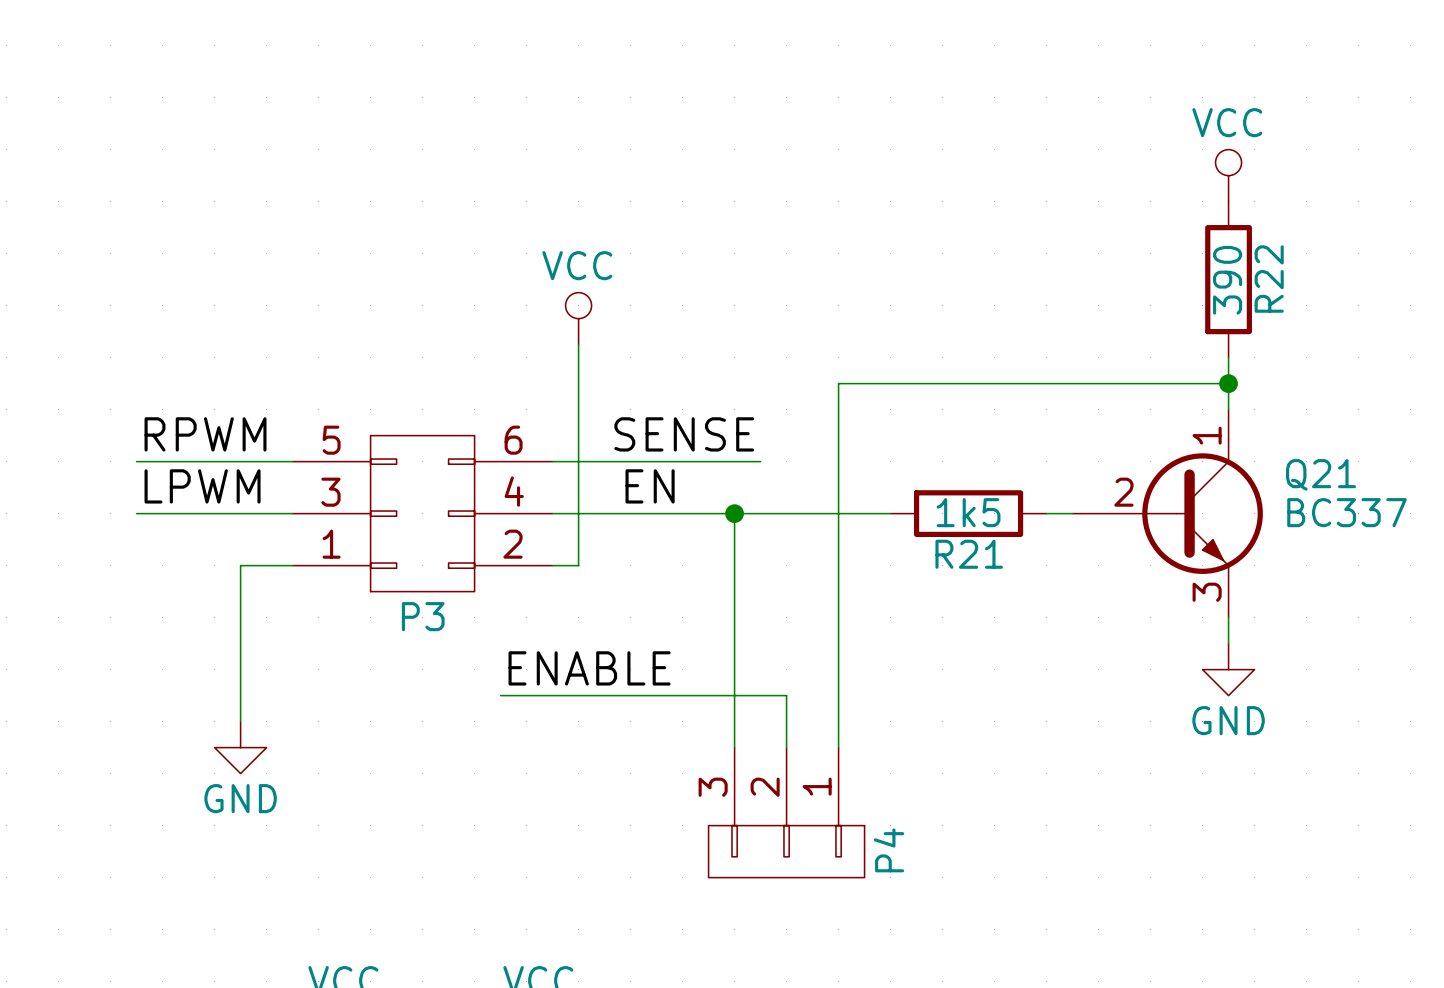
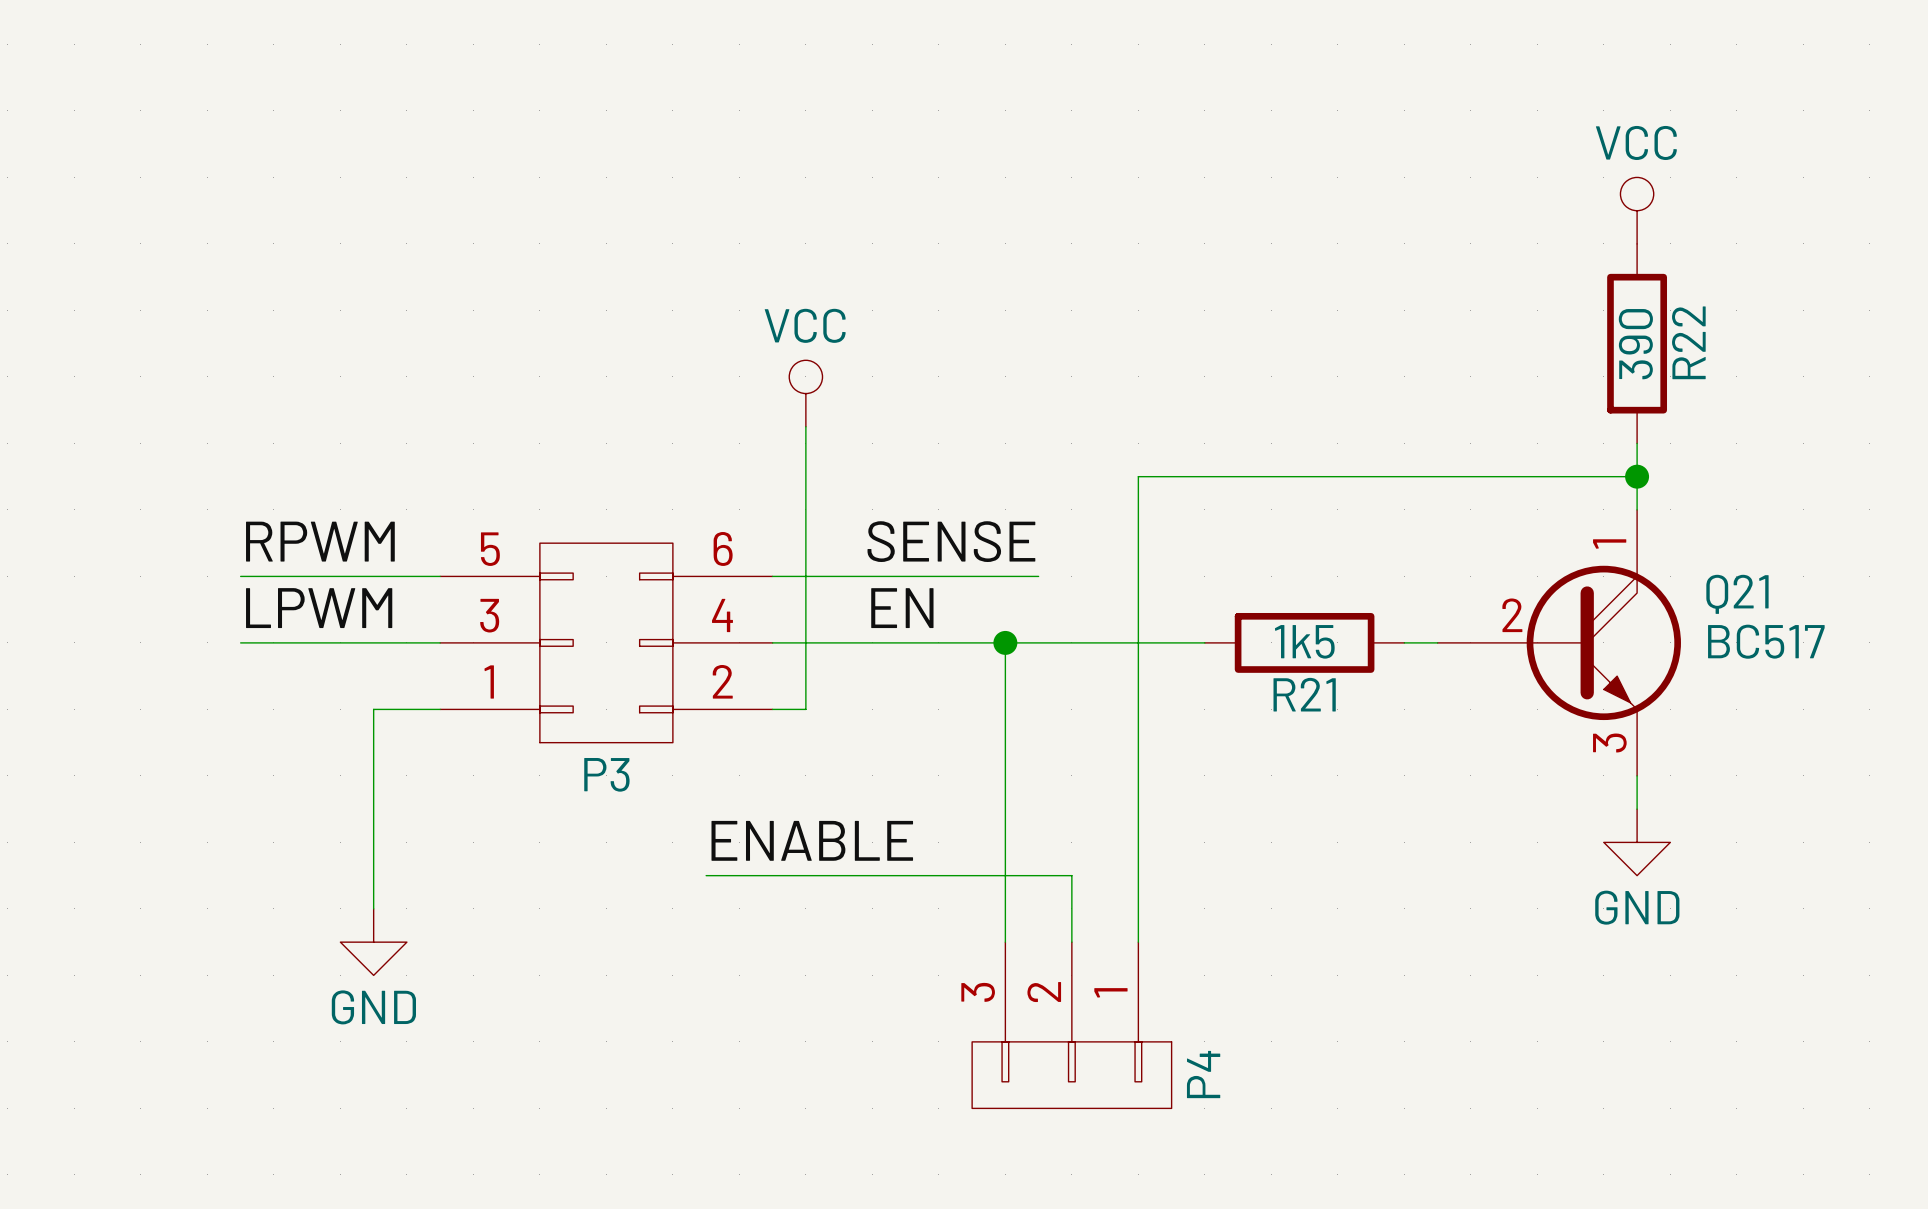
Q21 symbol: [1072, 409, 1263, 618] -> [1437, 509, 1681, 776]
Q21 value: BC337 (1346, 512) -> BC517 (1766, 641)

